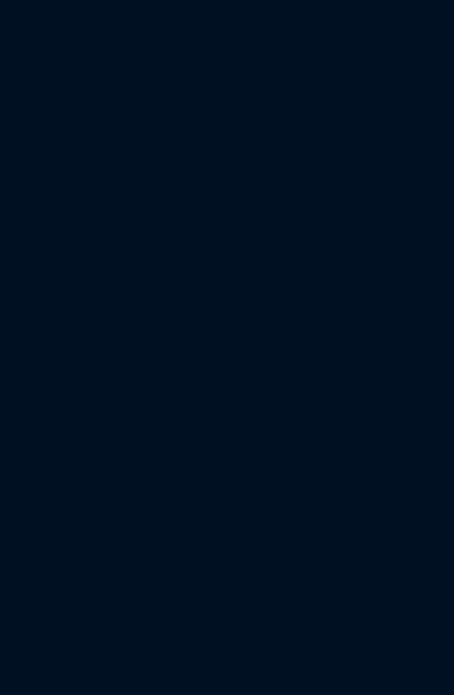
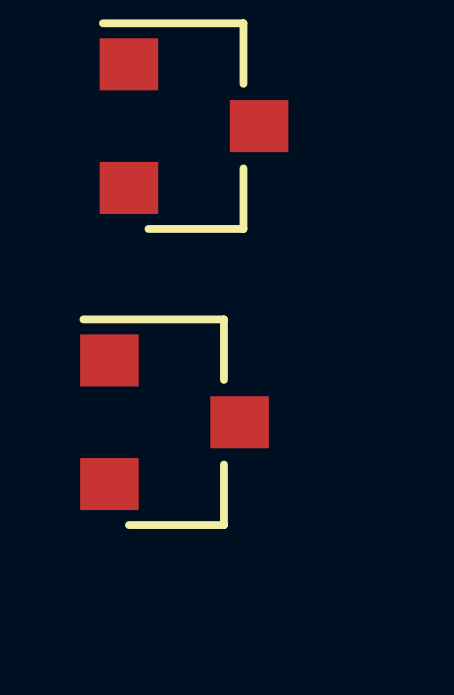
part: none -> (193, 126)
part: none -> (174, 422)

